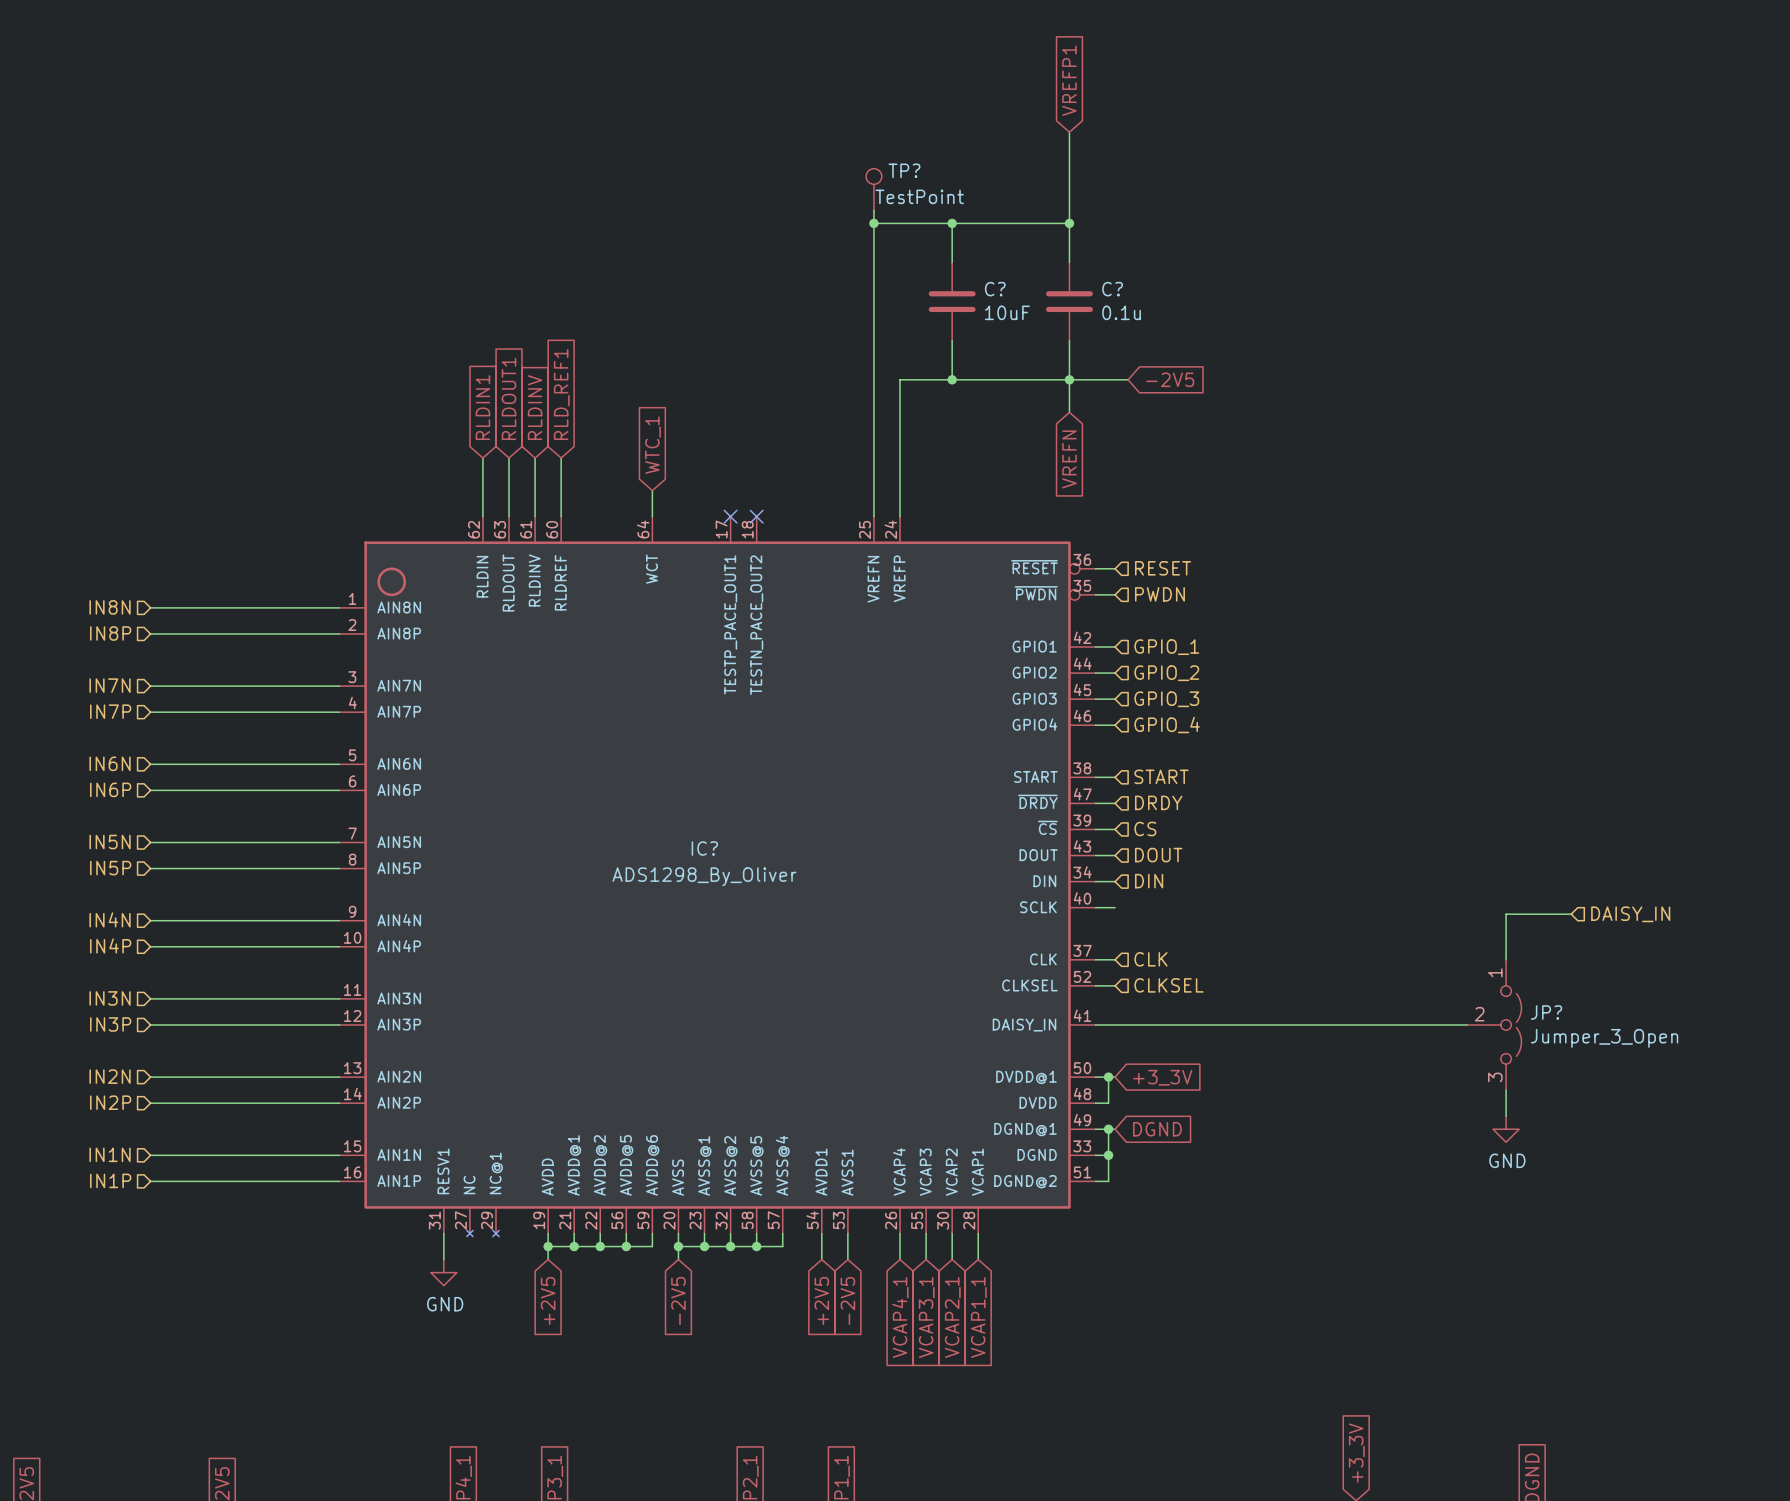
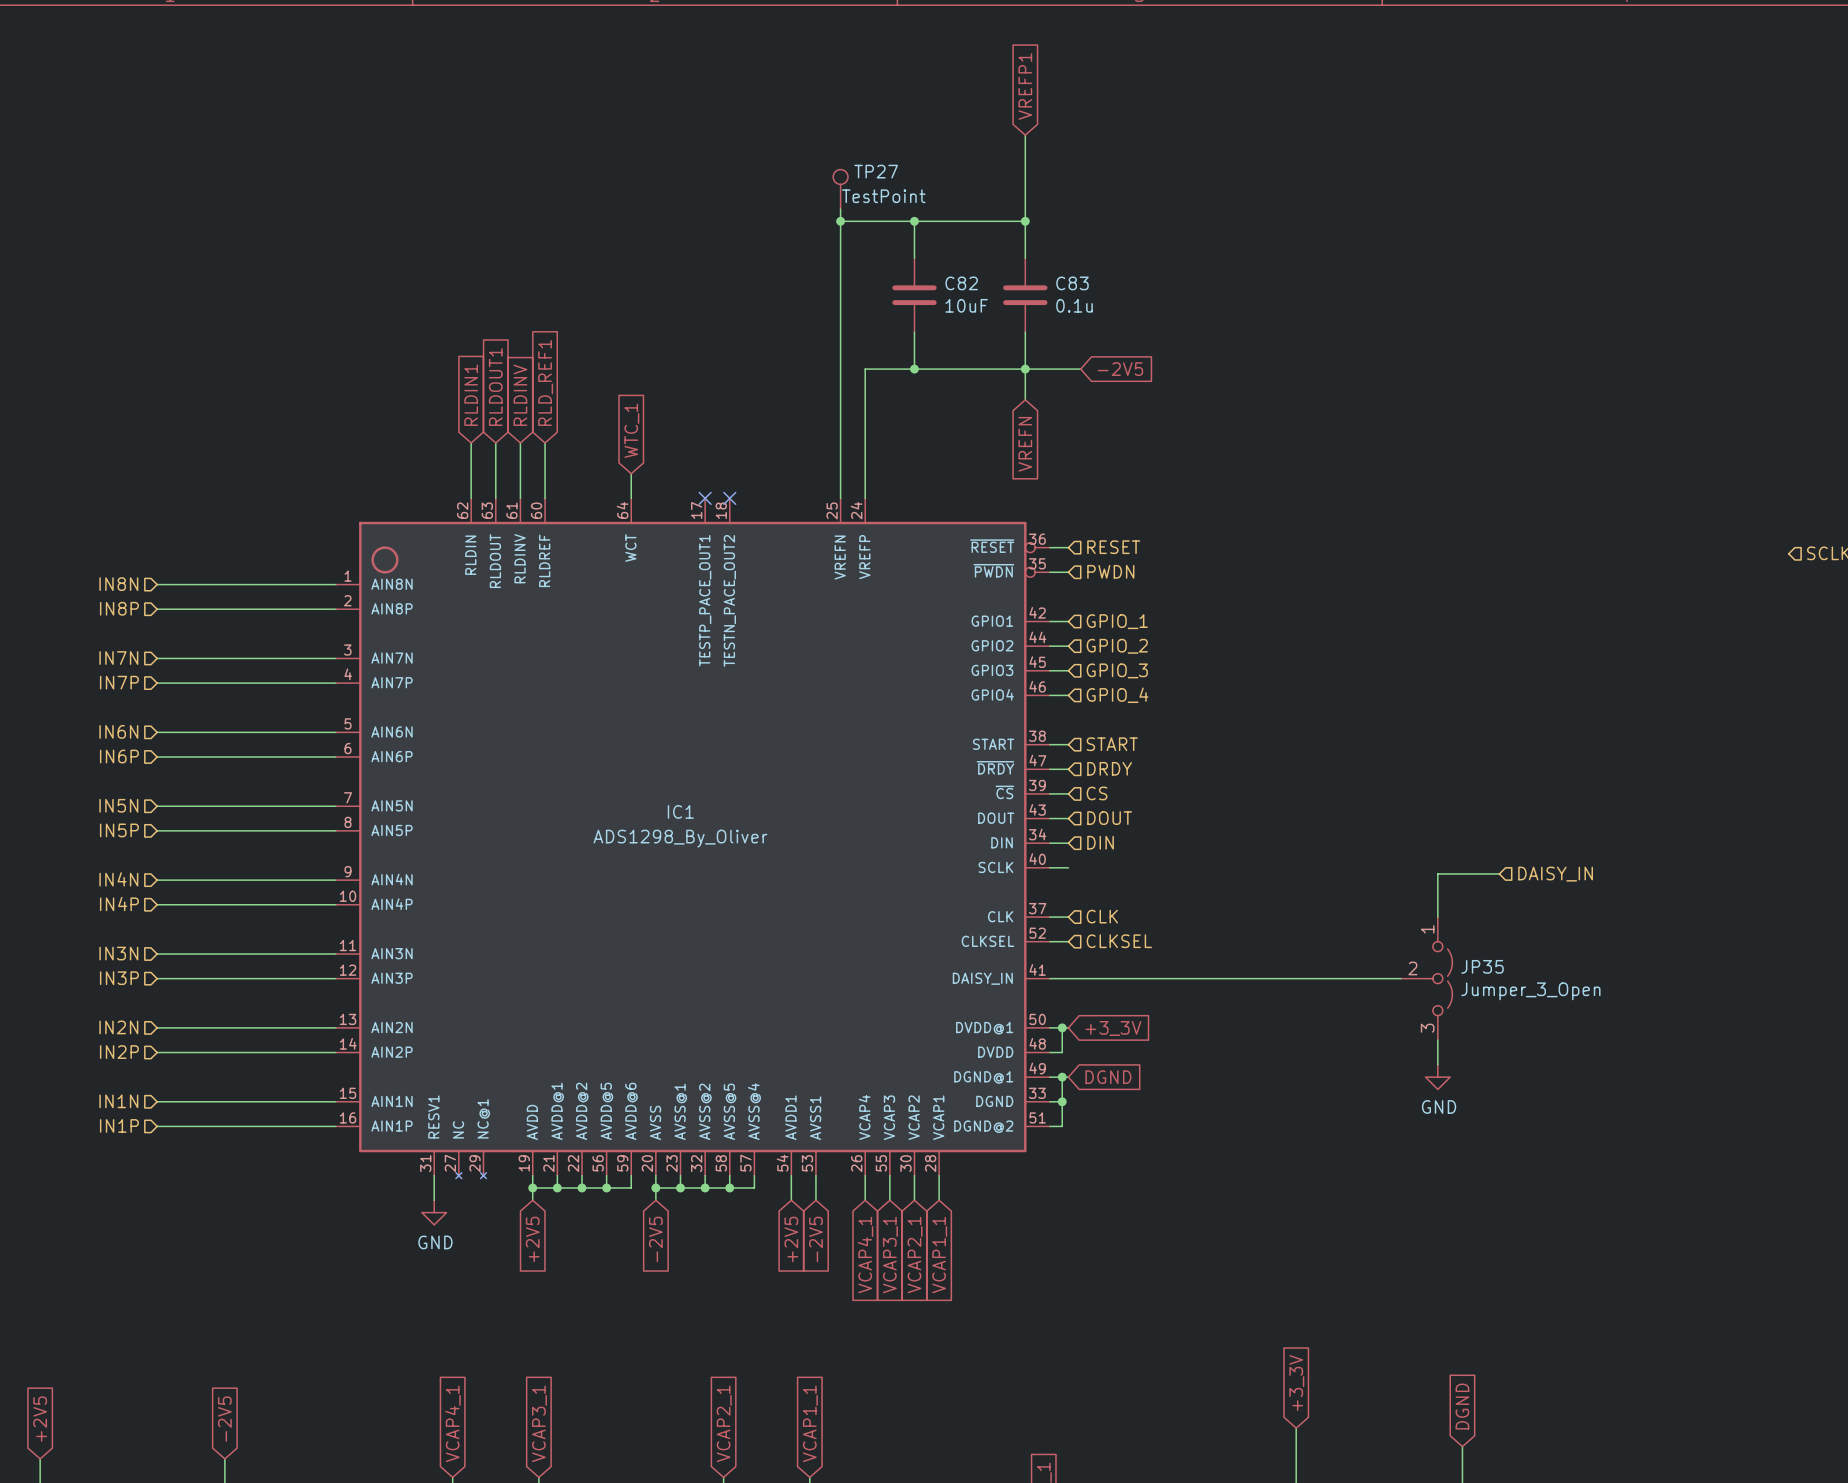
TP? name: TP? (904, 170) -> TP27 (876, 171)
C? name: C? (995, 289) -> C82 (961, 283)
C? name: C? (1112, 289) -> C83 (1072, 283)
IC? name: IC? (704, 848) -> IC1 (680, 811)
JP? name: JP? (1546, 1012) -> JP35 (1482, 966)

